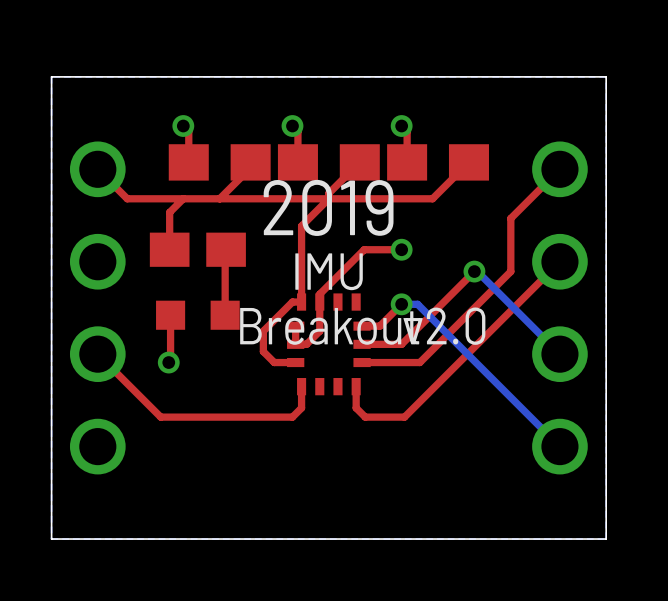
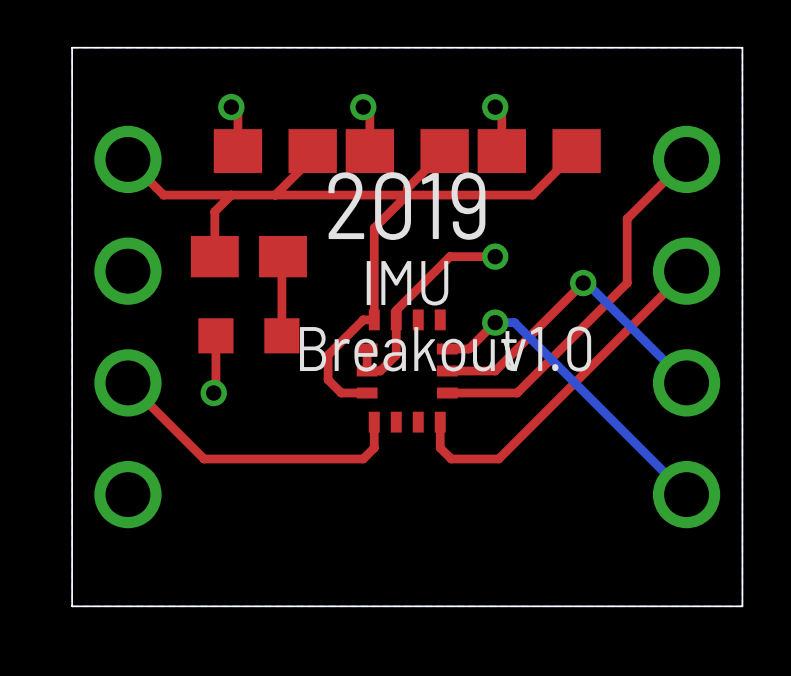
text: v2.0 (444, 326) -> v1.0 (546, 349)

